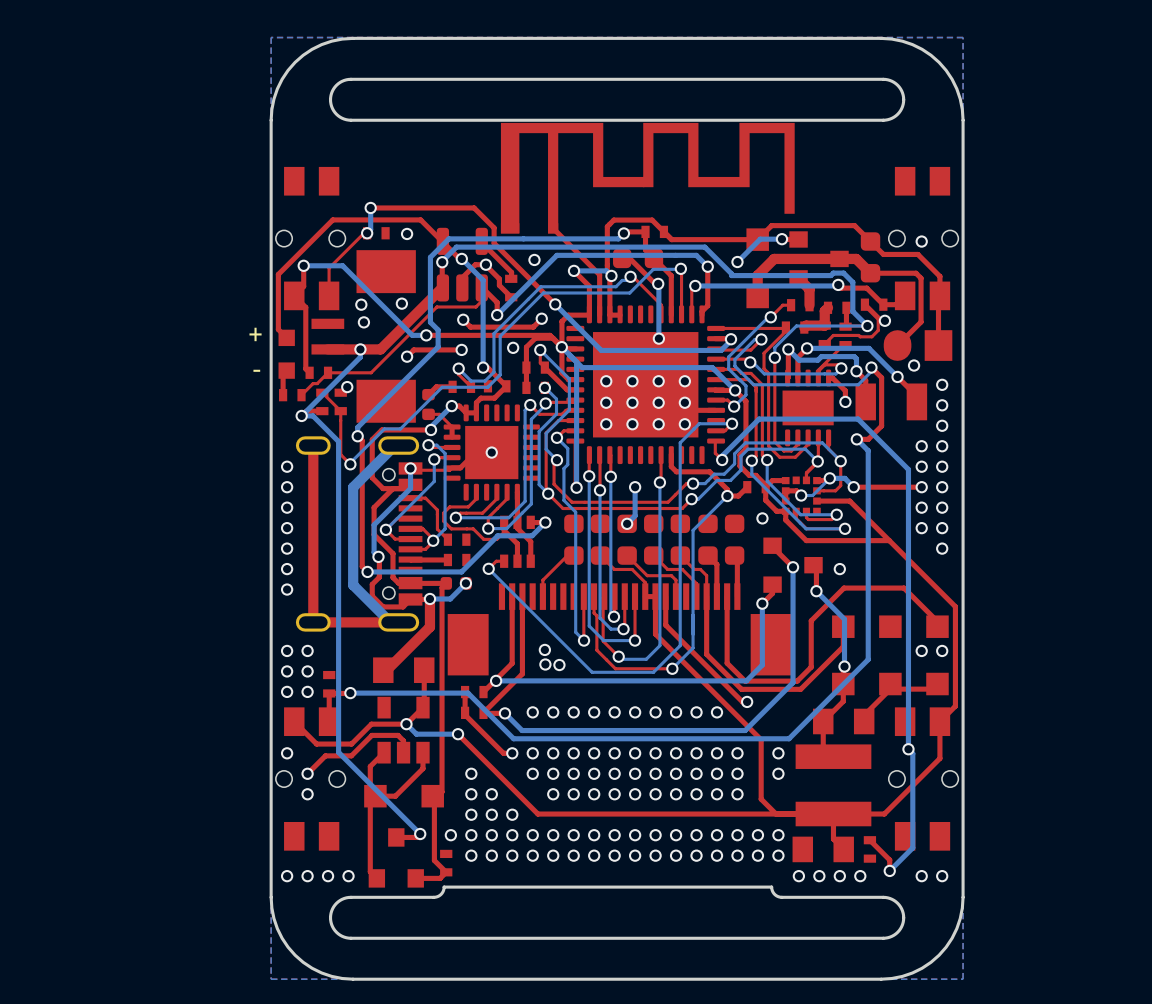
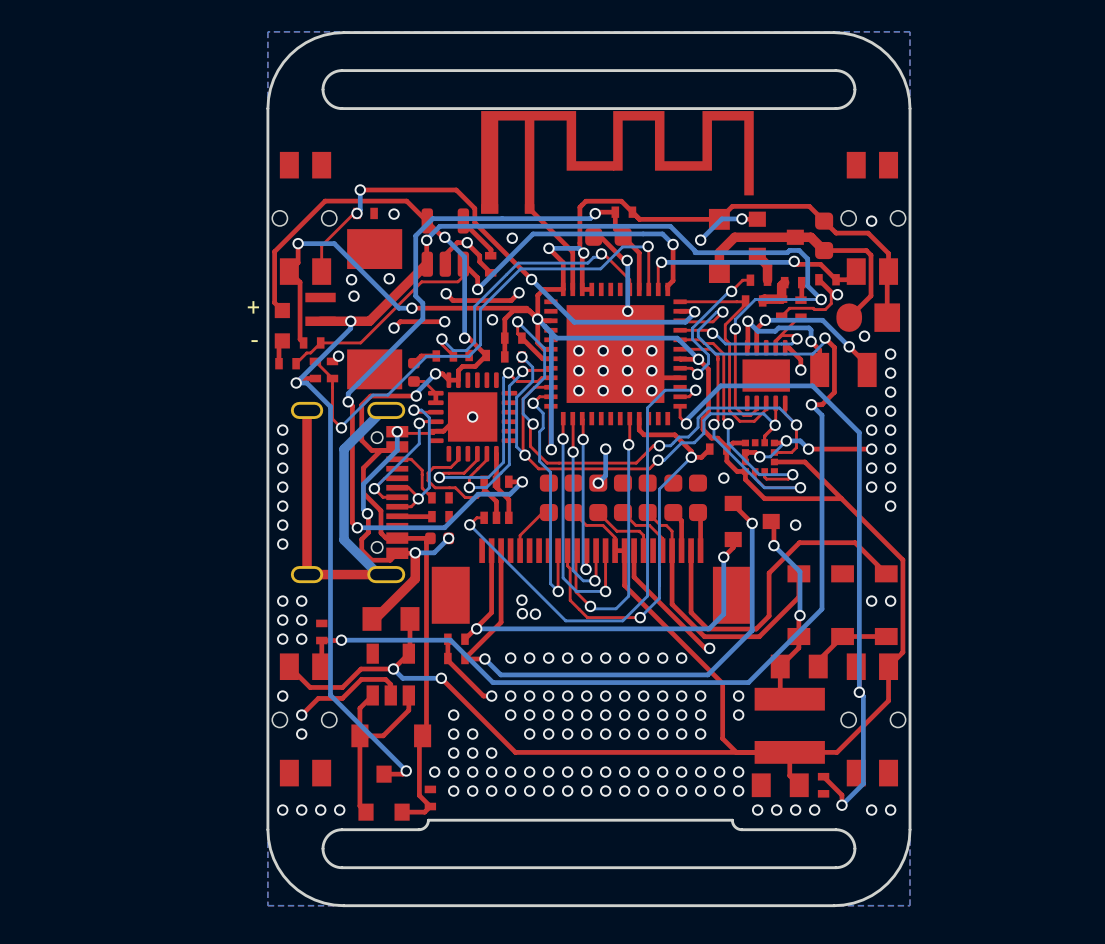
part footprint: [566, 305, 726, 465] -> [544, 282, 687, 426]
part footprint: [832, 615, 855, 696] -> [787, 565, 811, 646]
part footprint: [879, 615, 902, 696] -> [831, 565, 854, 646]
part footprint: [926, 615, 949, 696] -> [874, 565, 898, 646]
part footprint: [364, 784, 444, 808] -> [351, 724, 432, 748]

